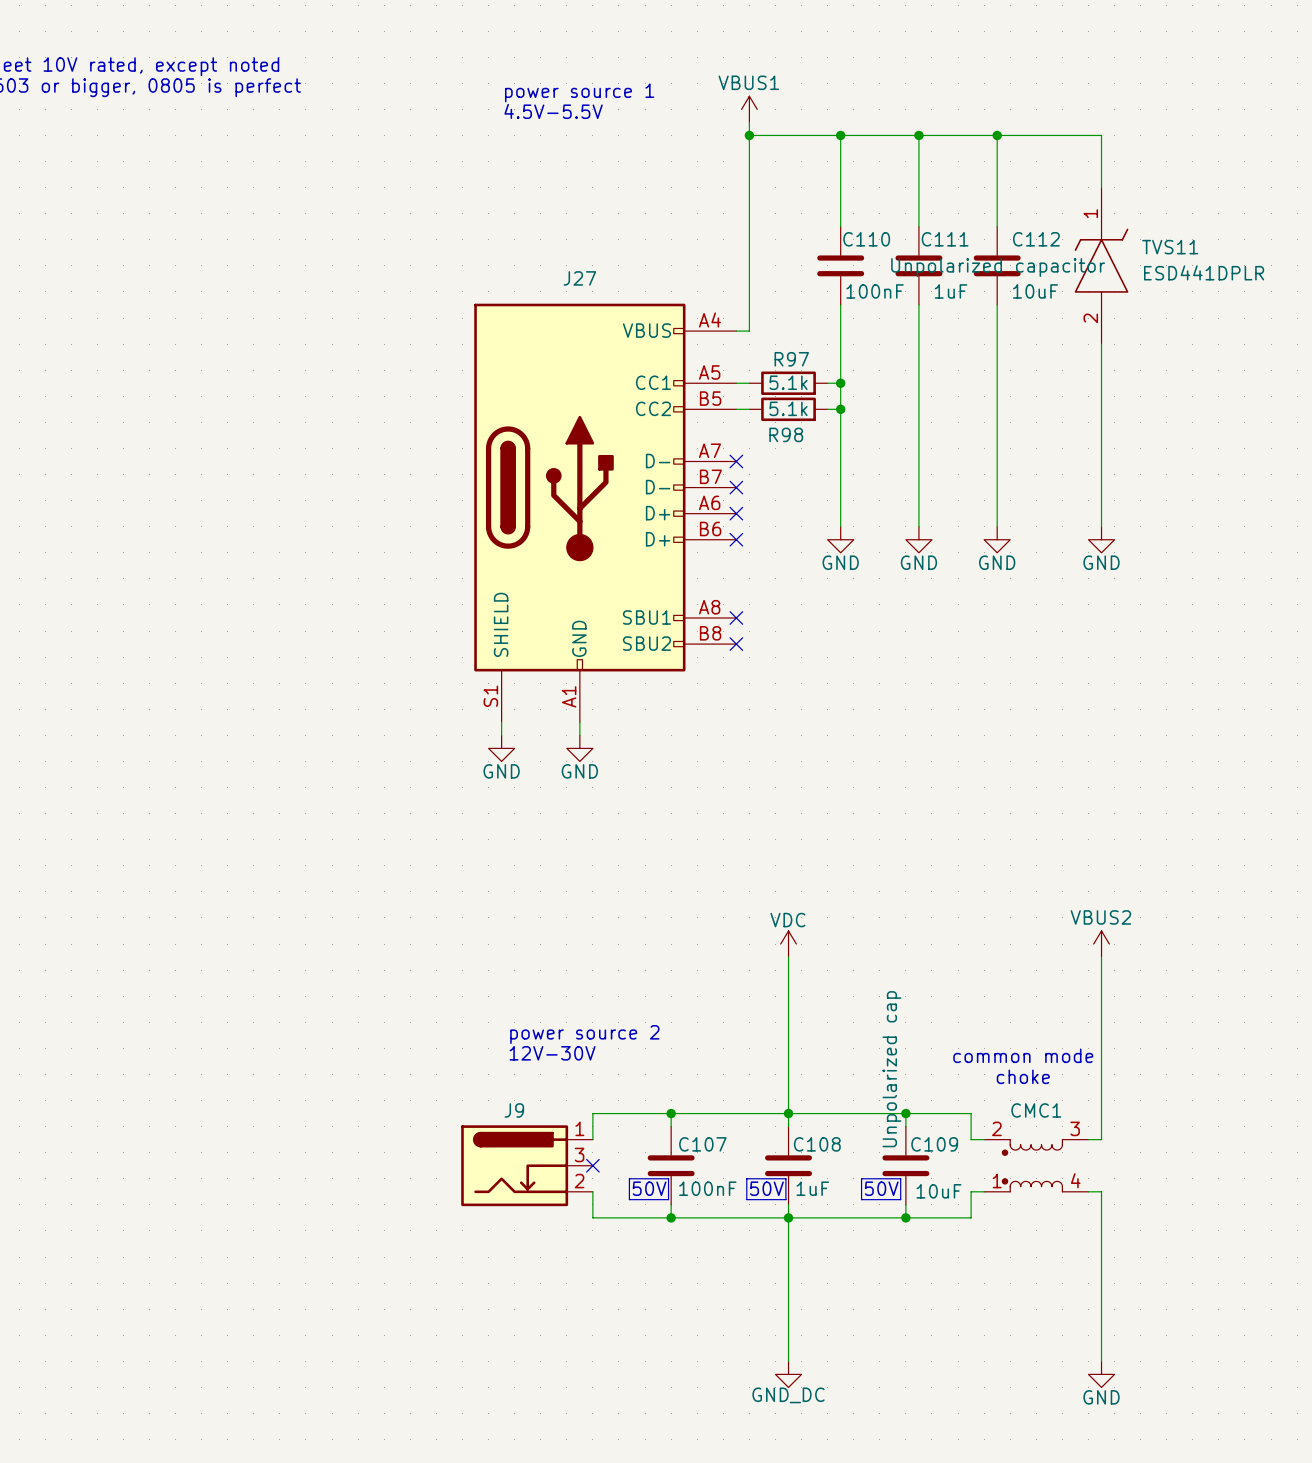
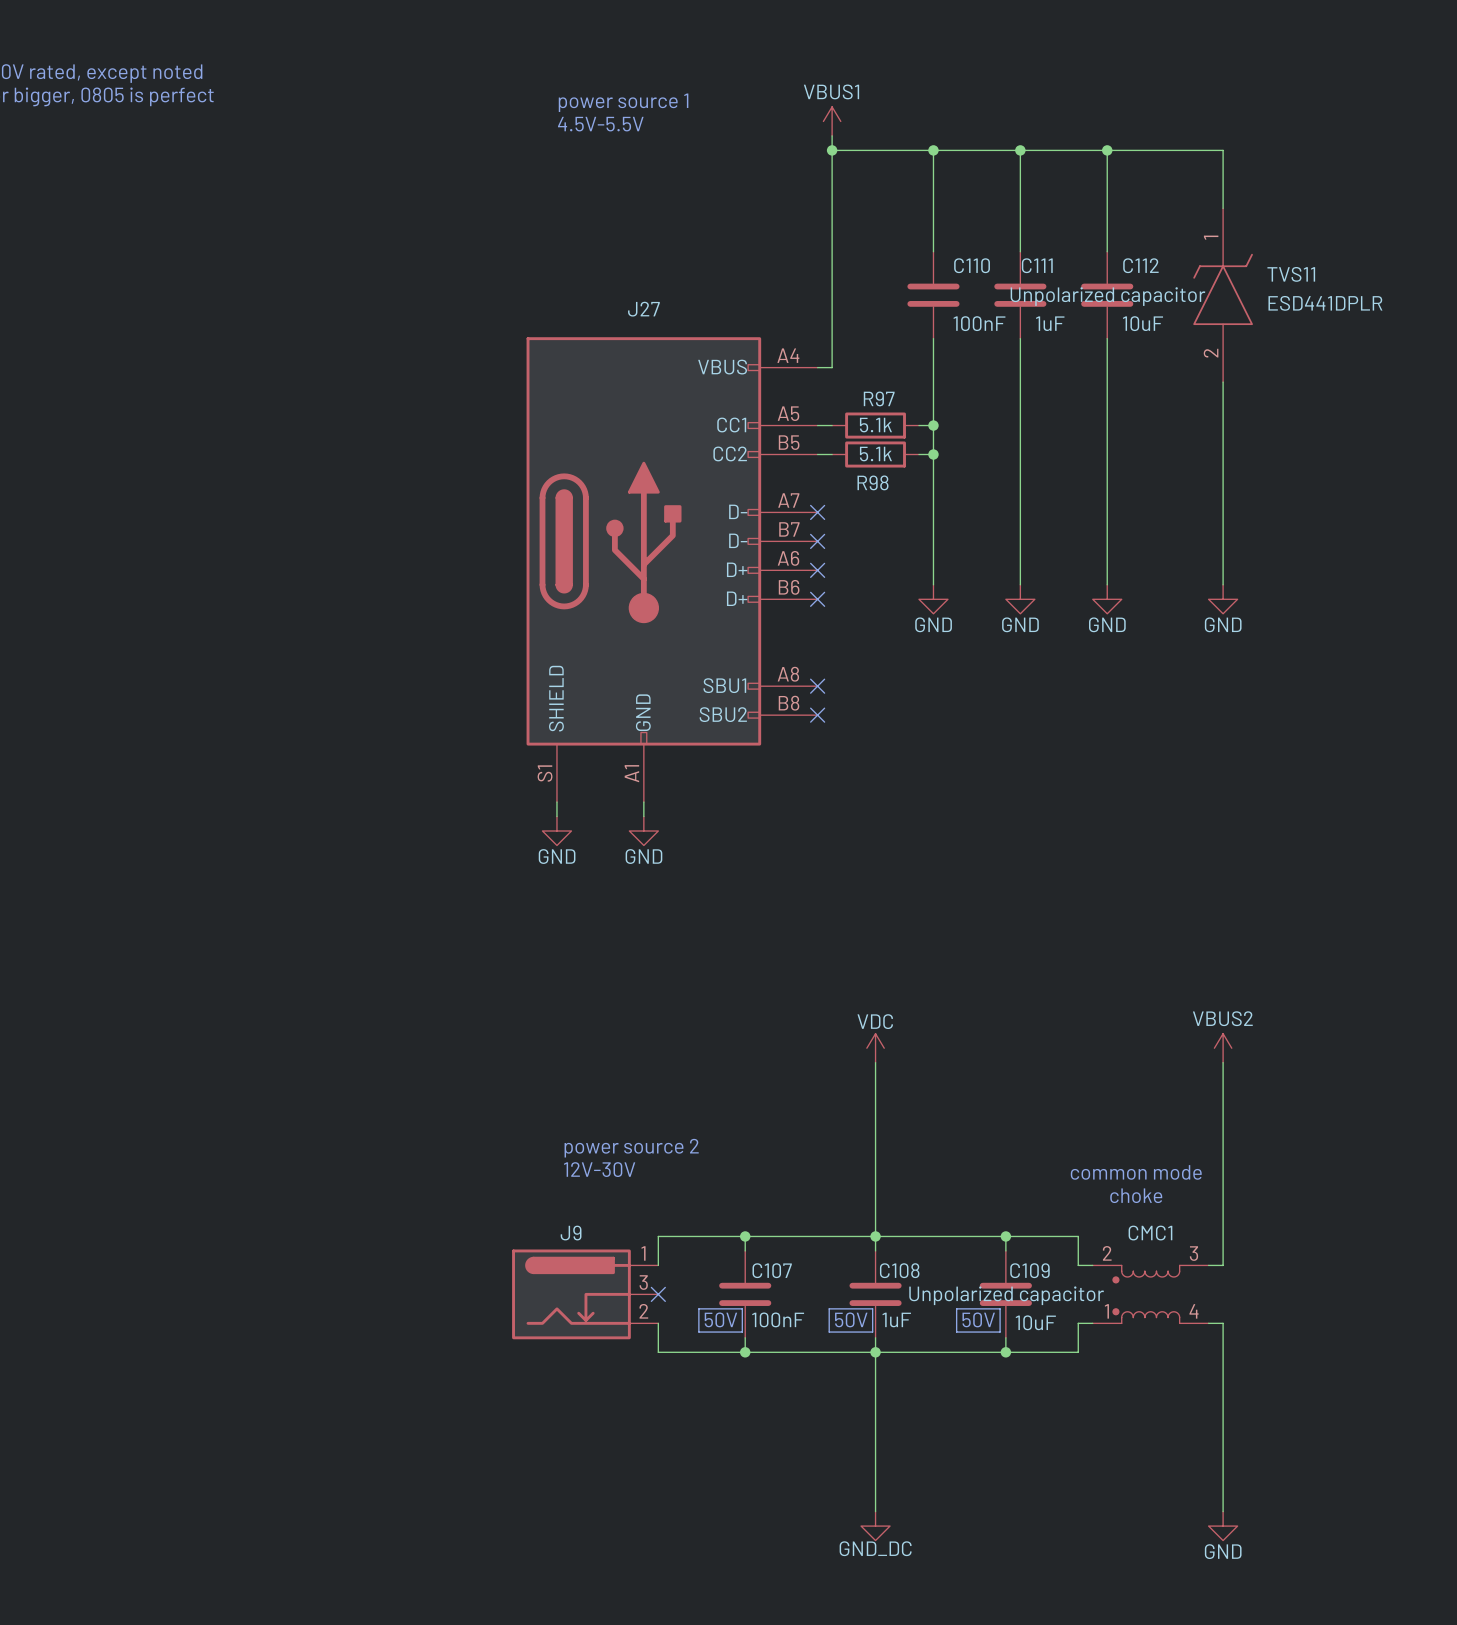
C109 text: Unpolarized cap (891, 1069) -> Unpolarized capacitor (1006, 1295)

